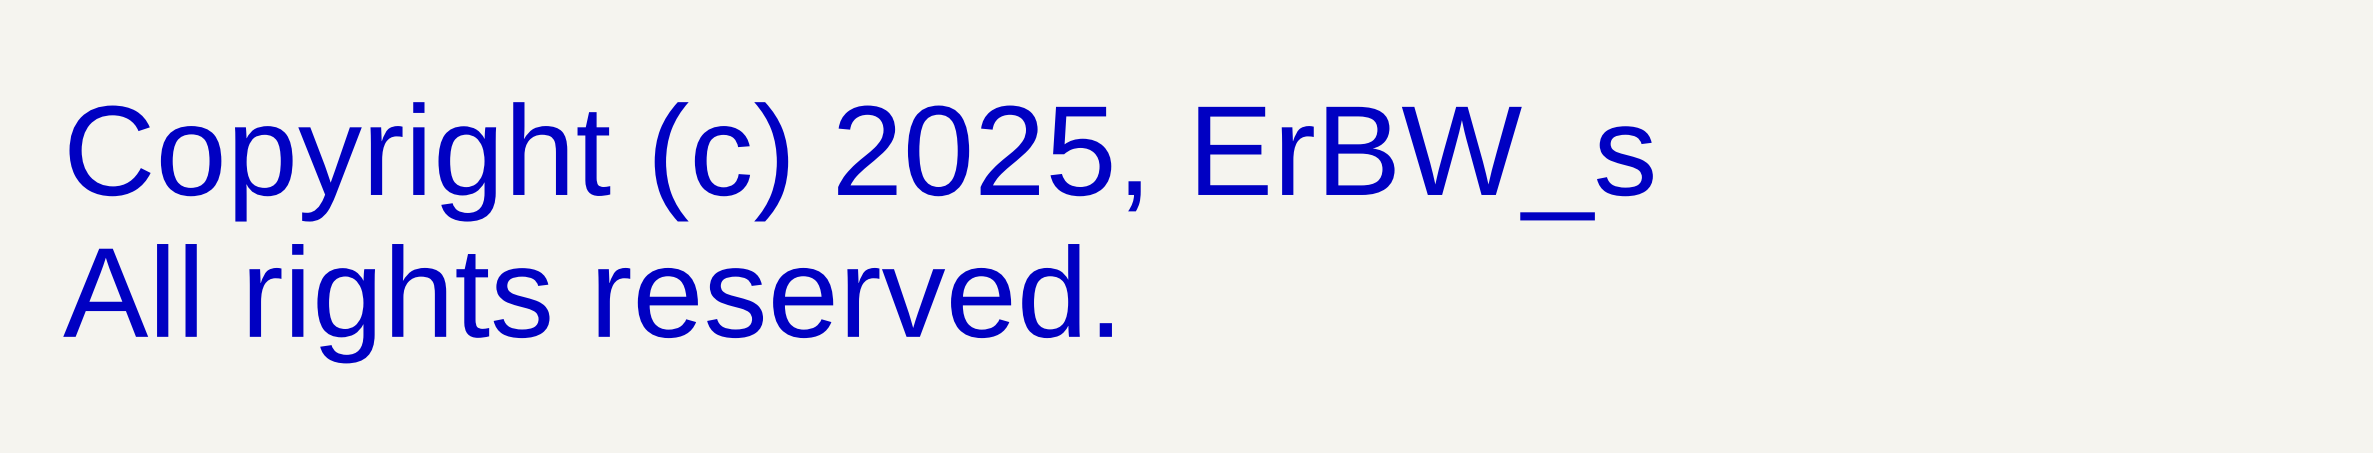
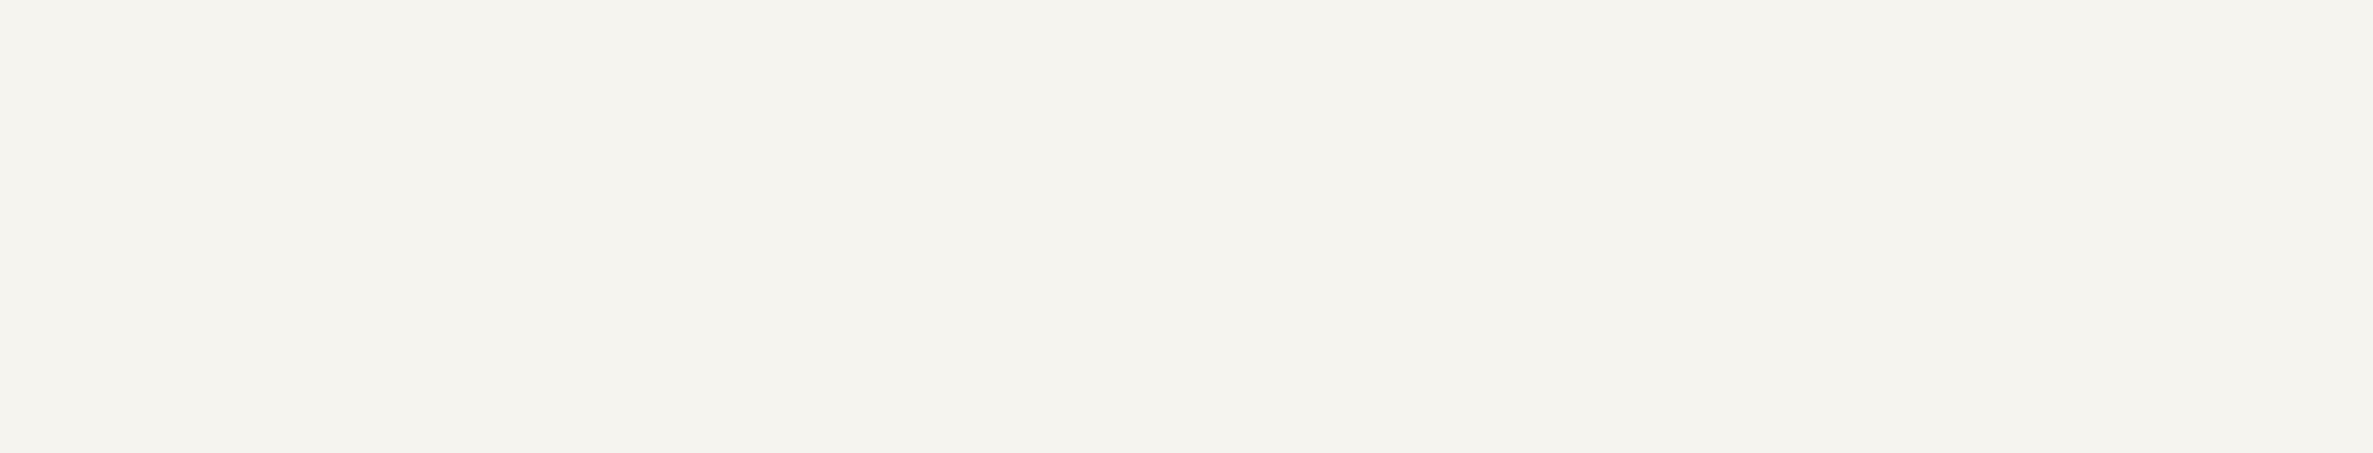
text: Copyright (c) 2025, ErBW_s (861, 161) -> none
text: All rights reserved. (587, 303) -> none

